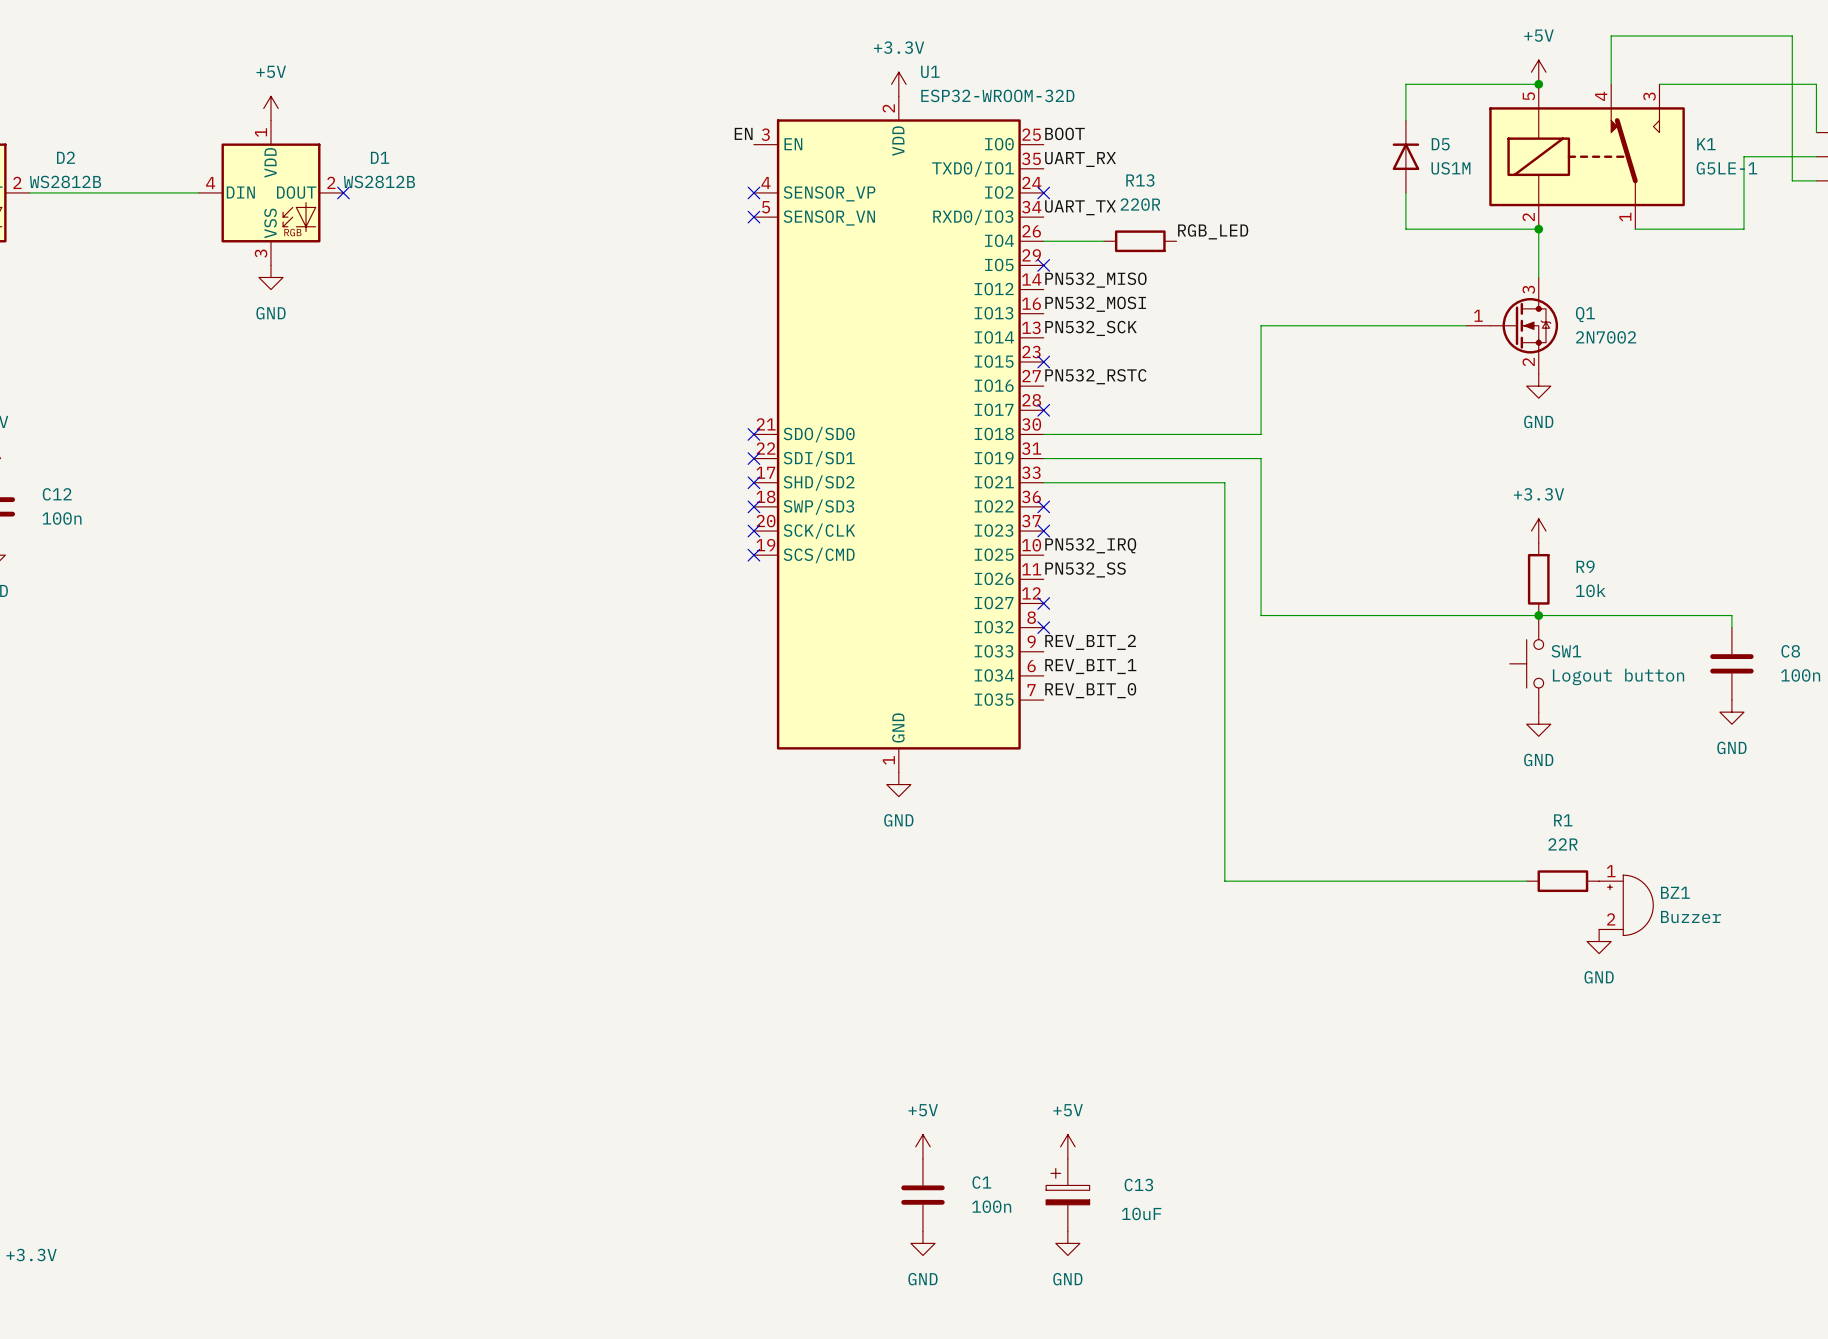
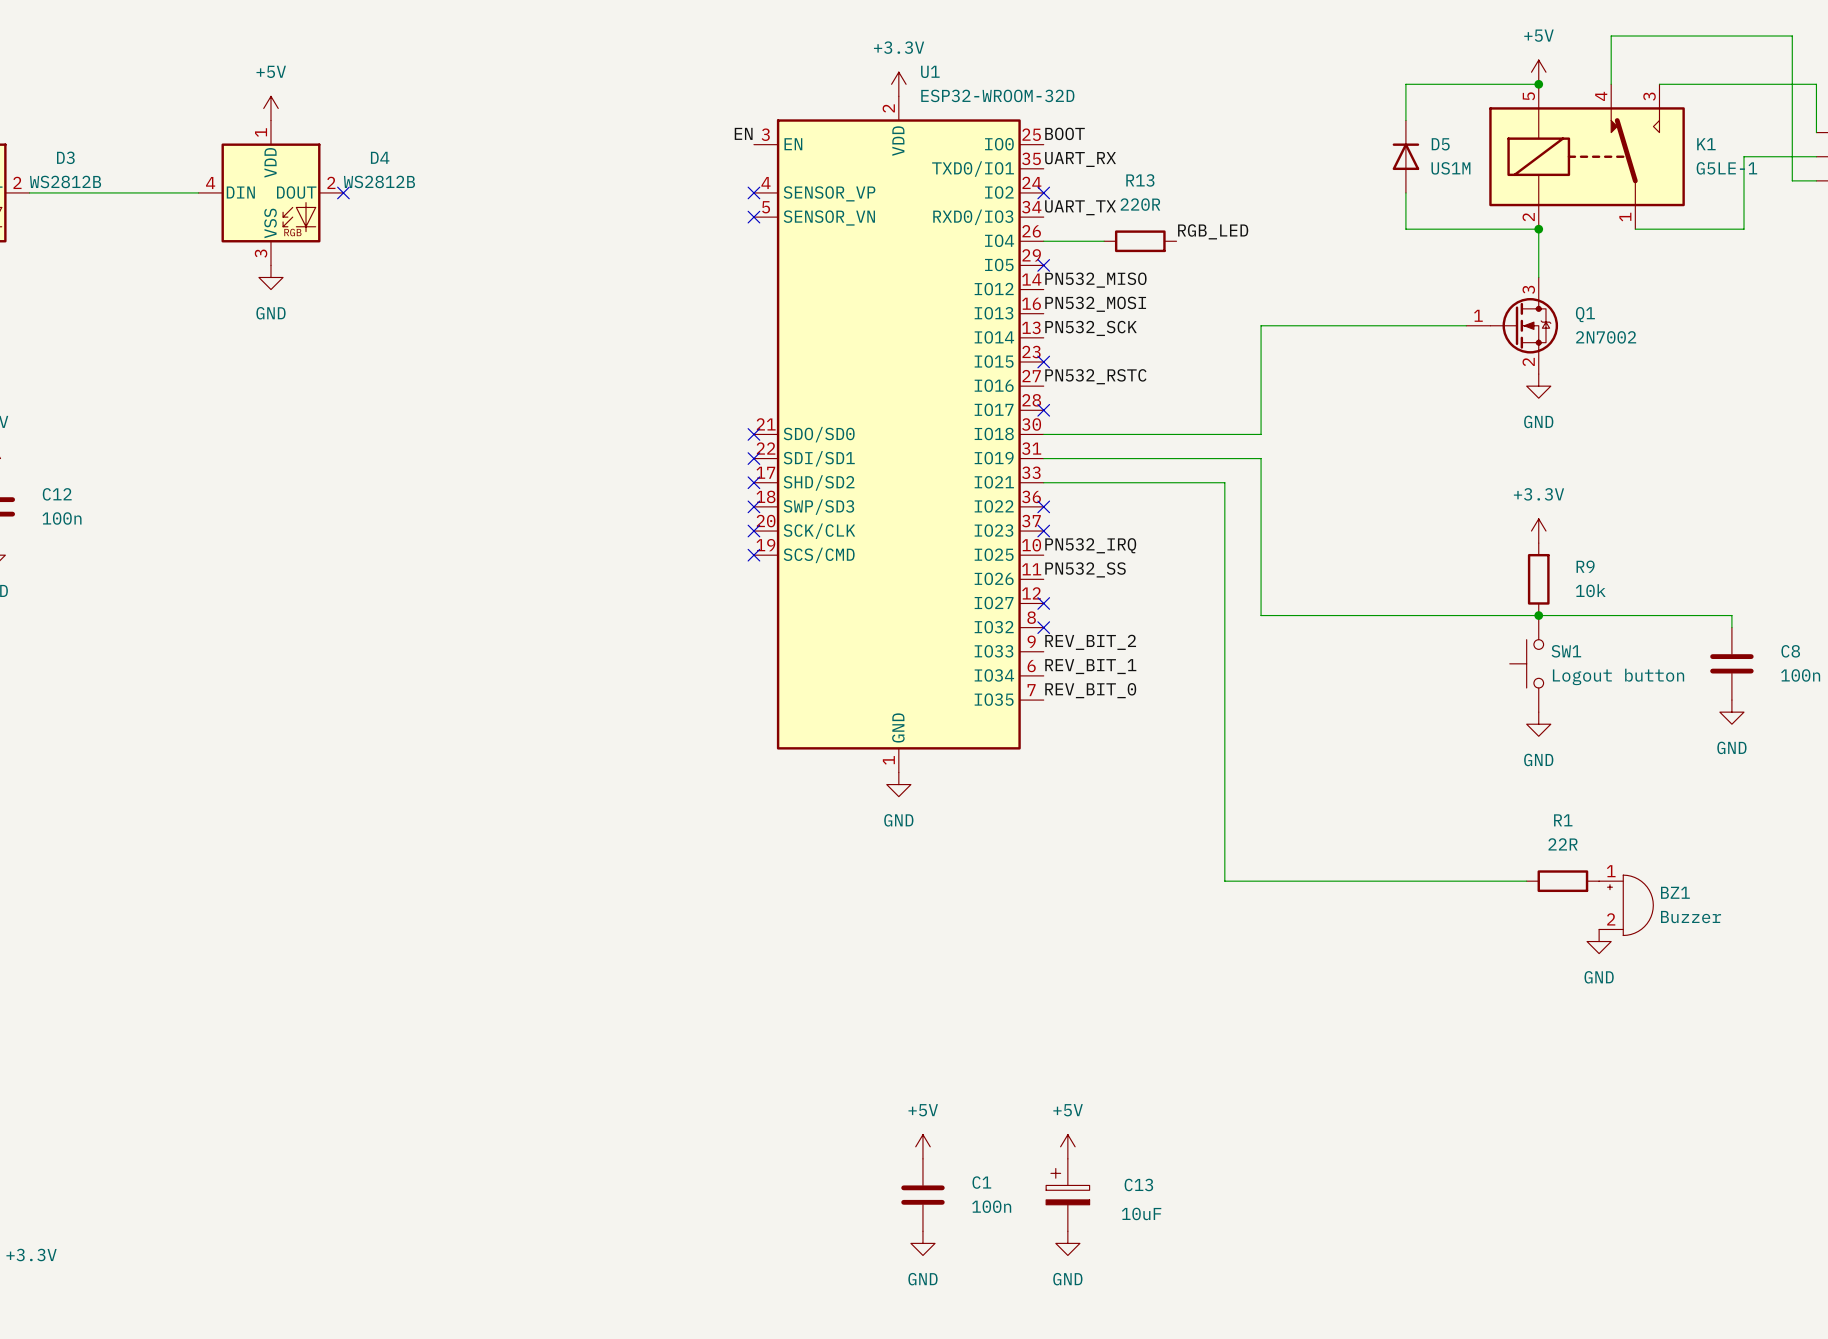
D2 name: D2 (66, 157) -> D3 (65, 157)
D1 name: D1 (380, 157) -> D4 (380, 157)

